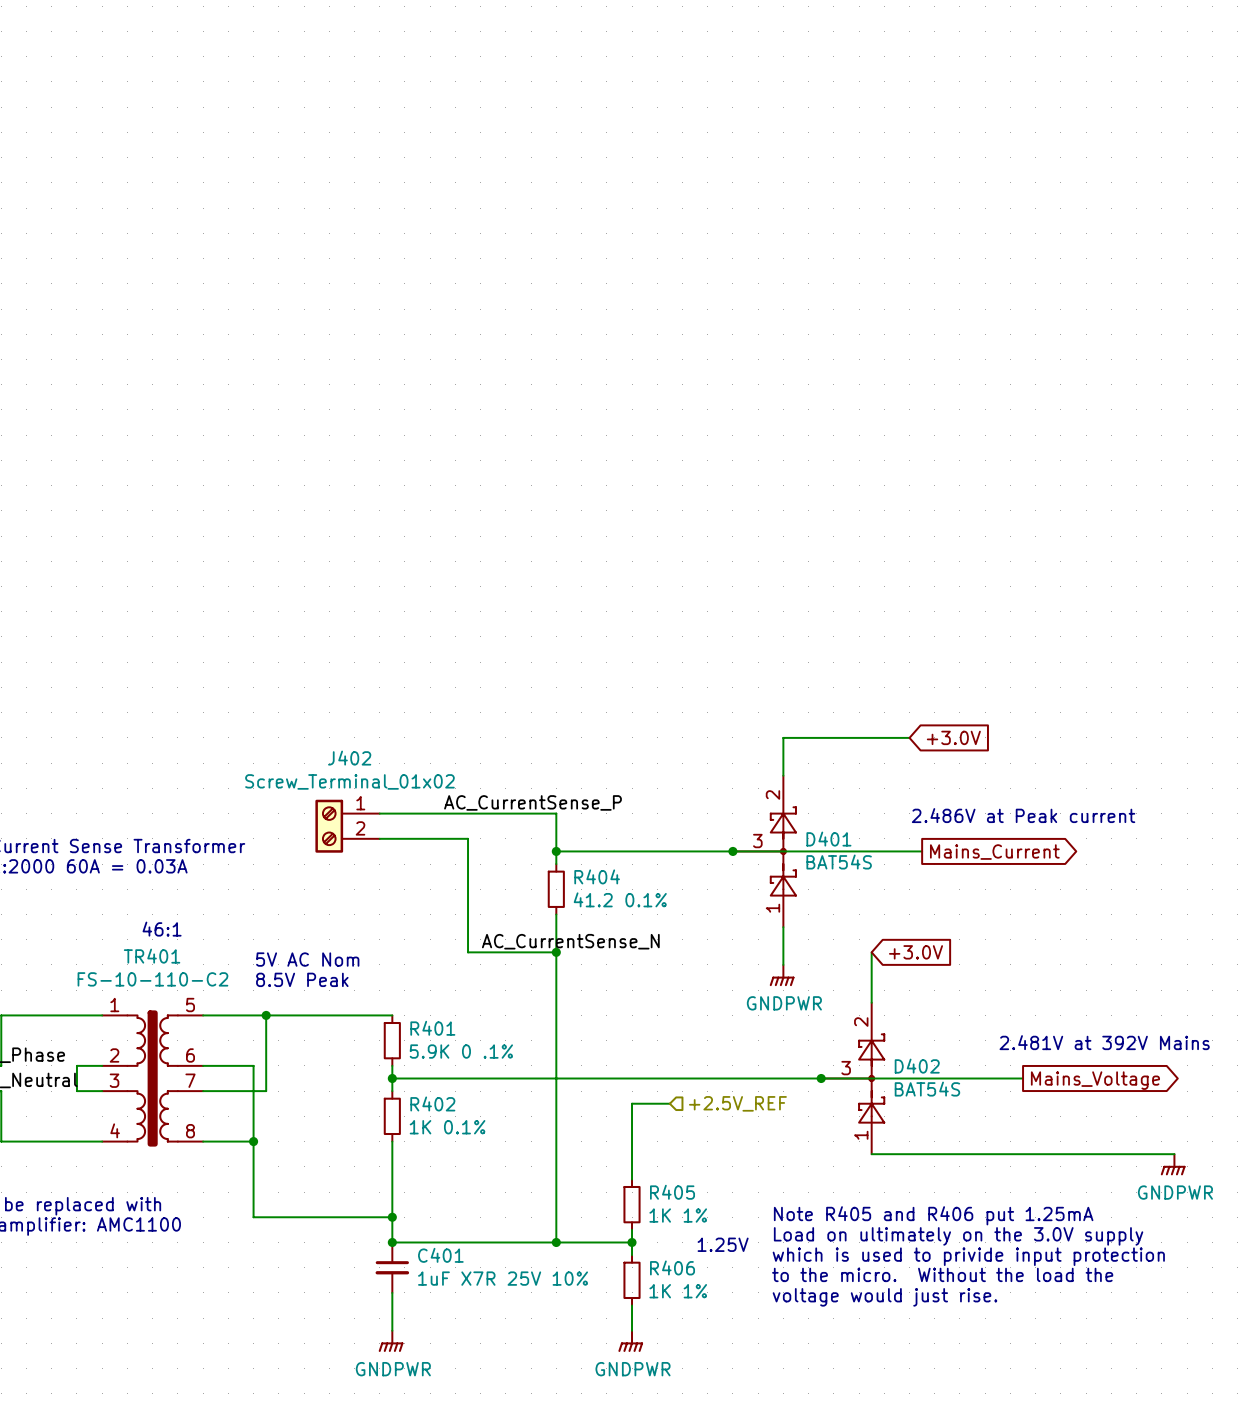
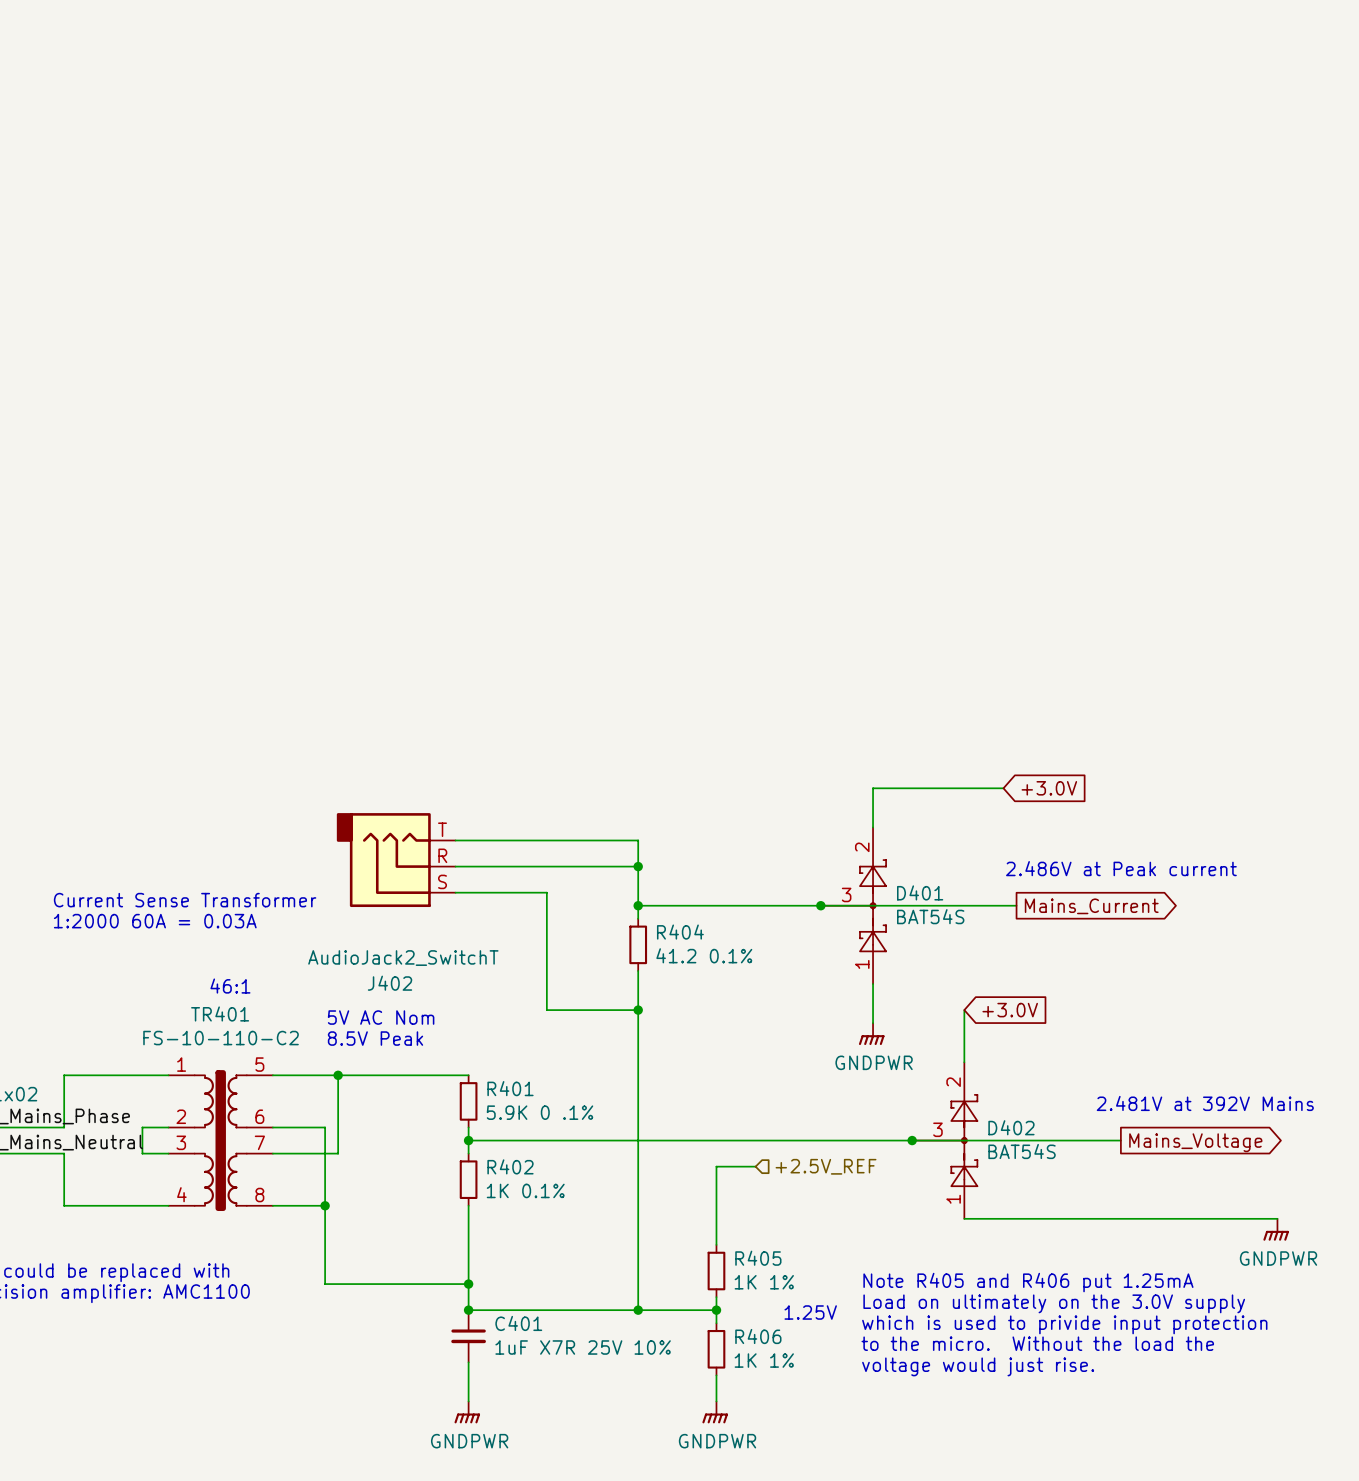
J402 name position: J402 (349, 758) -> J402 (390, 983)
J402 value: Screw_Terminal_01x02 (349, 781) -> AudioJack2_SwitchT (403, 958)
wire: none -> (455, 840) (638, 840) (638, 866)
J402 symbol: [315, 799, 380, 853] -> [336, 813, 456, 908]
label: AC_CurrentSense_P (532, 802) -> none
junction: none -> (638, 866)
label: AC_CurrentSense_N (570, 941) -> none

